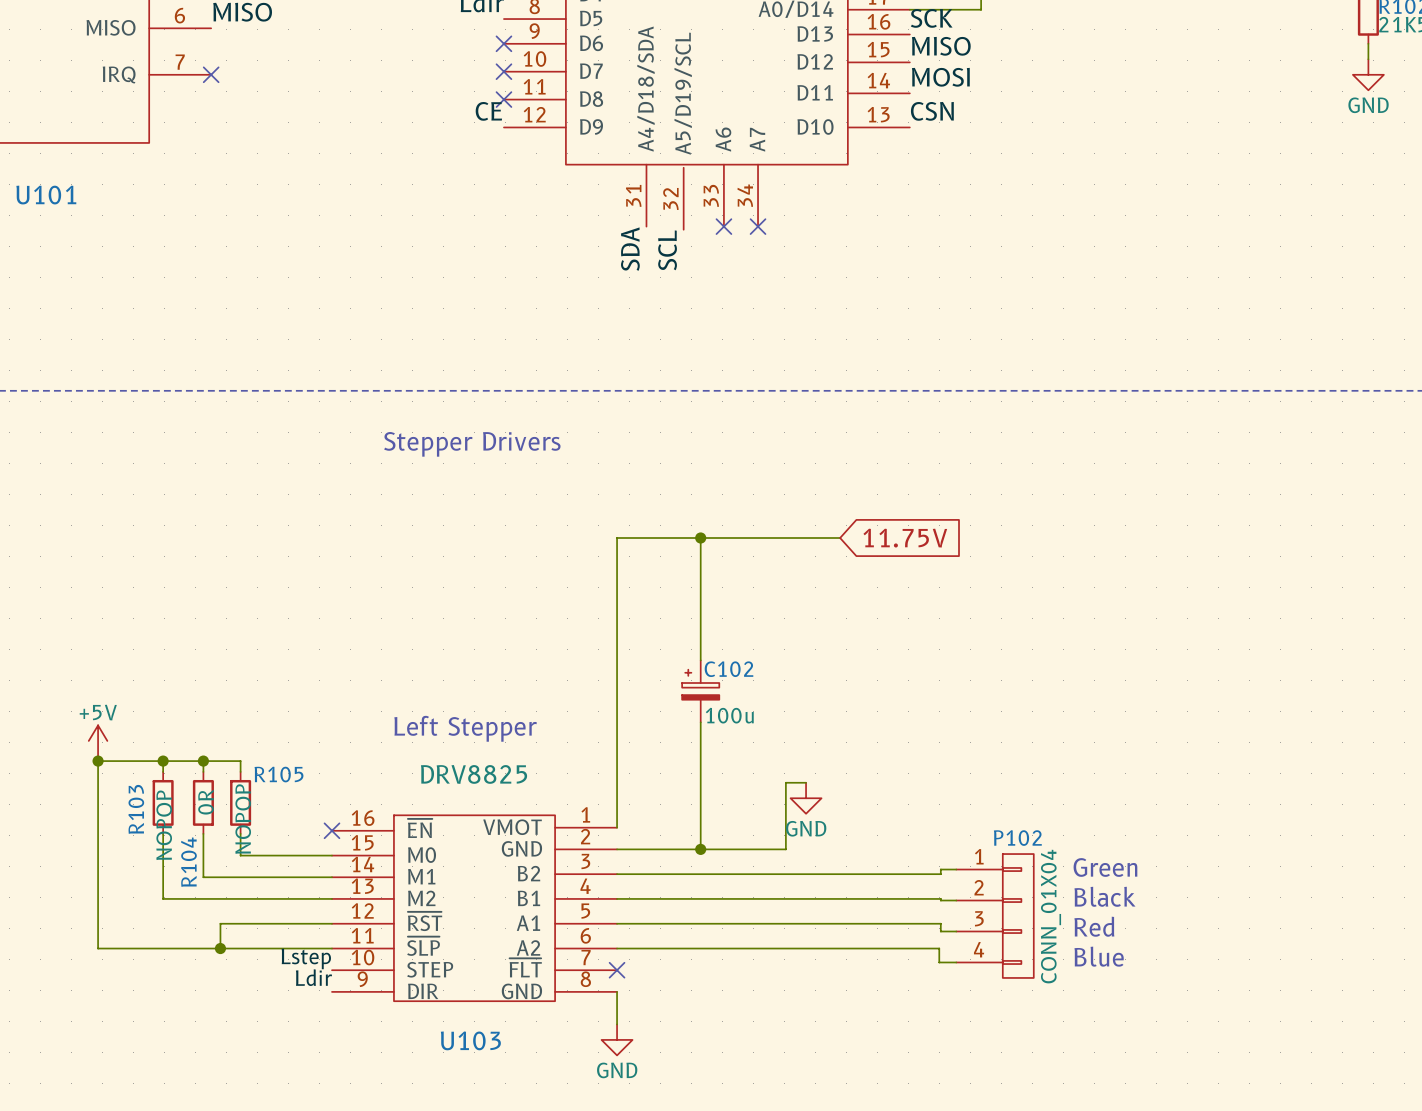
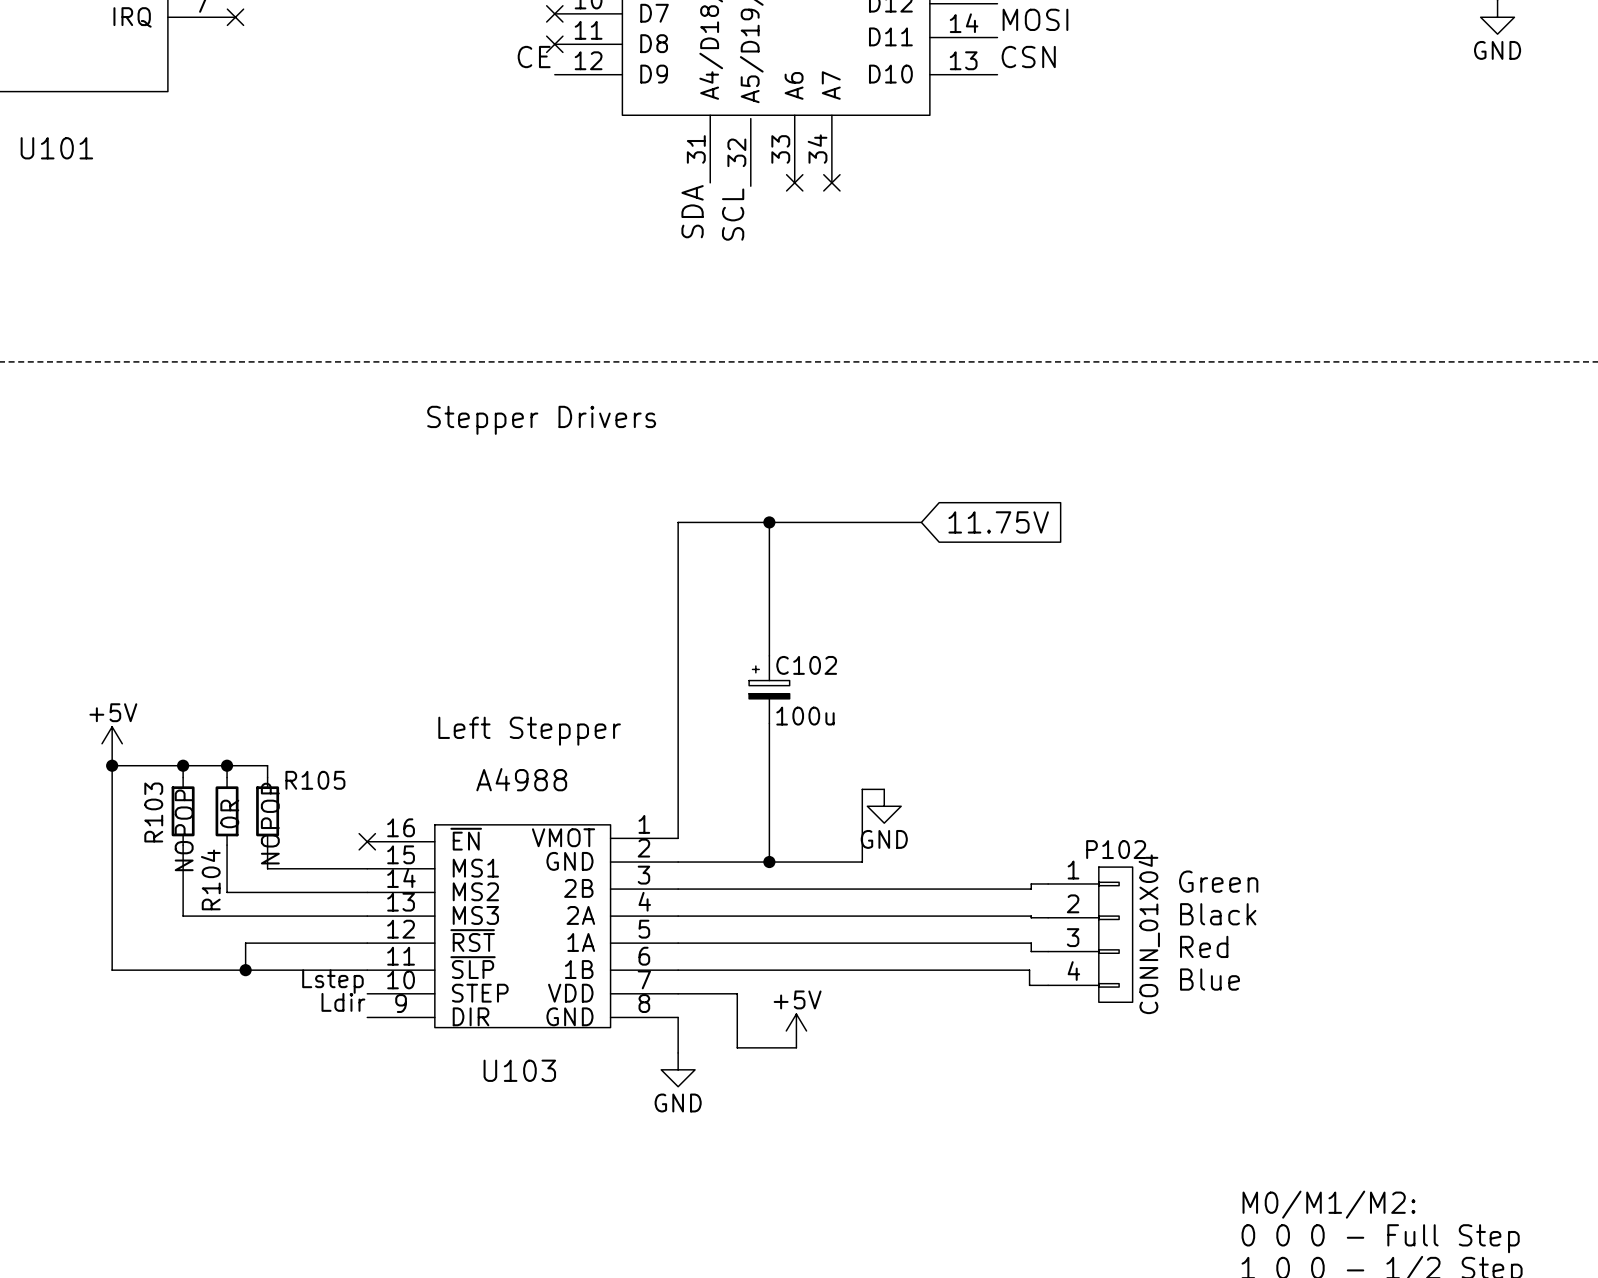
U103 value: DRV8825 (474, 774) -> A4988 (521, 779)
U103 pin name: M0 (422, 855) -> MS1 (475, 868)
U103 pin name: B2 (529, 873) -> 2B (578, 888)
U103 pin name: M1 (421, 876) -> MS2 (475, 891)
U103 pin name: M2 (421, 898) -> MS3 (475, 915)
U103 pin name: B1 (528, 898) -> 2A (580, 915)
U103 pin name: A1 (528, 923) -> 1A (581, 942)
U103 pin name: A2 (528, 947) -> 1B (579, 969)
U103 pin name: ~{FLT} (525, 967) -> VDD (570, 993)
wire: none -> (678, 993) (737, 993) (737, 1047) (796, 1047)
no-connect mark: (617, 970) -> none
power symbol: none -> +5V (796, 1030)

